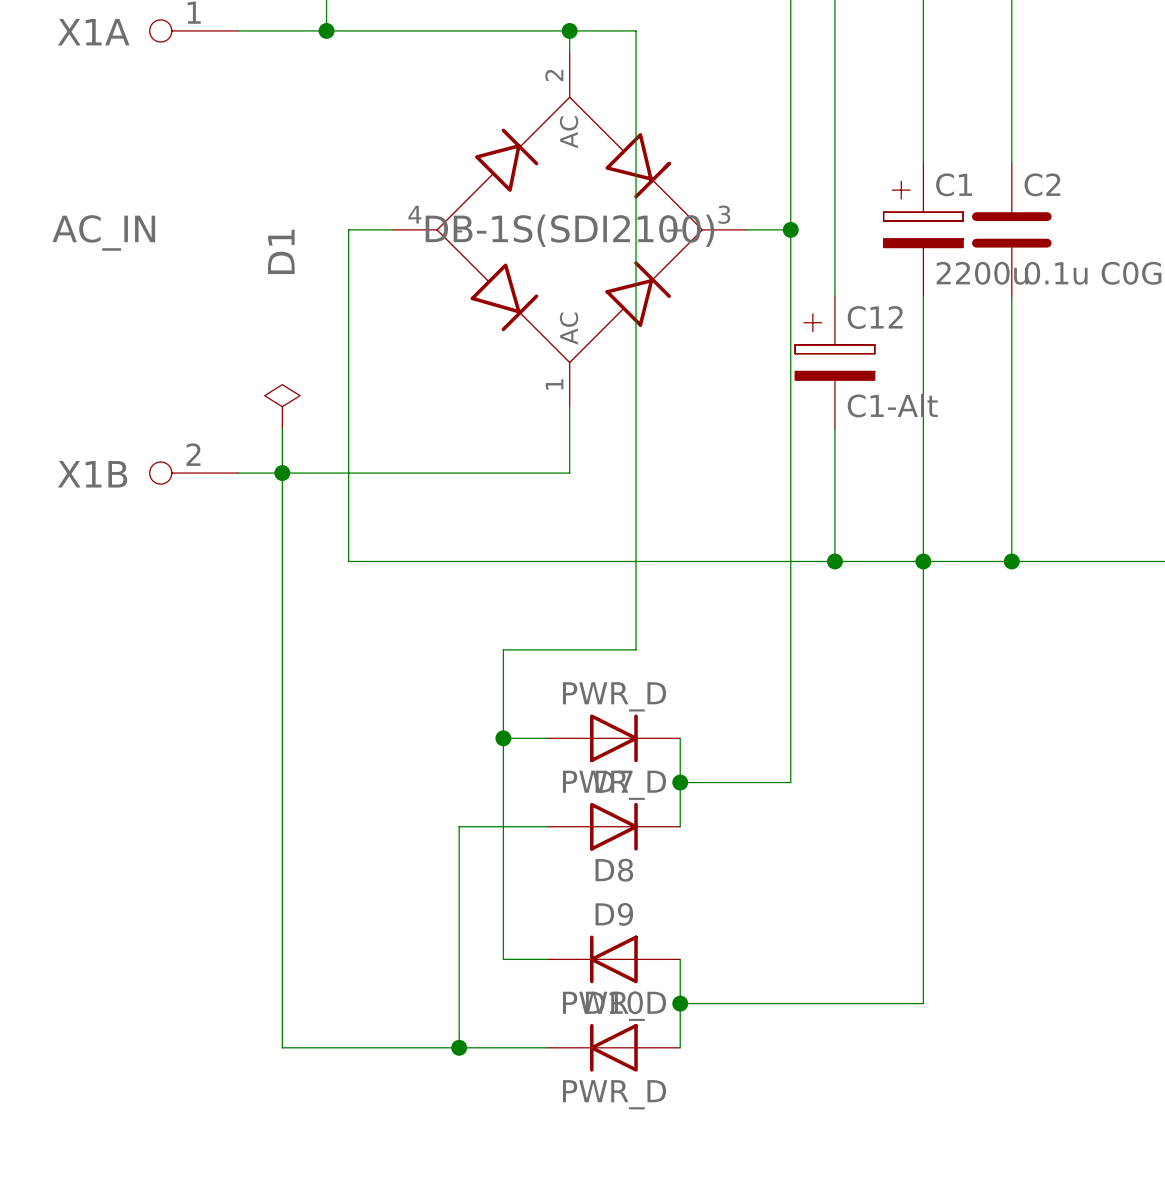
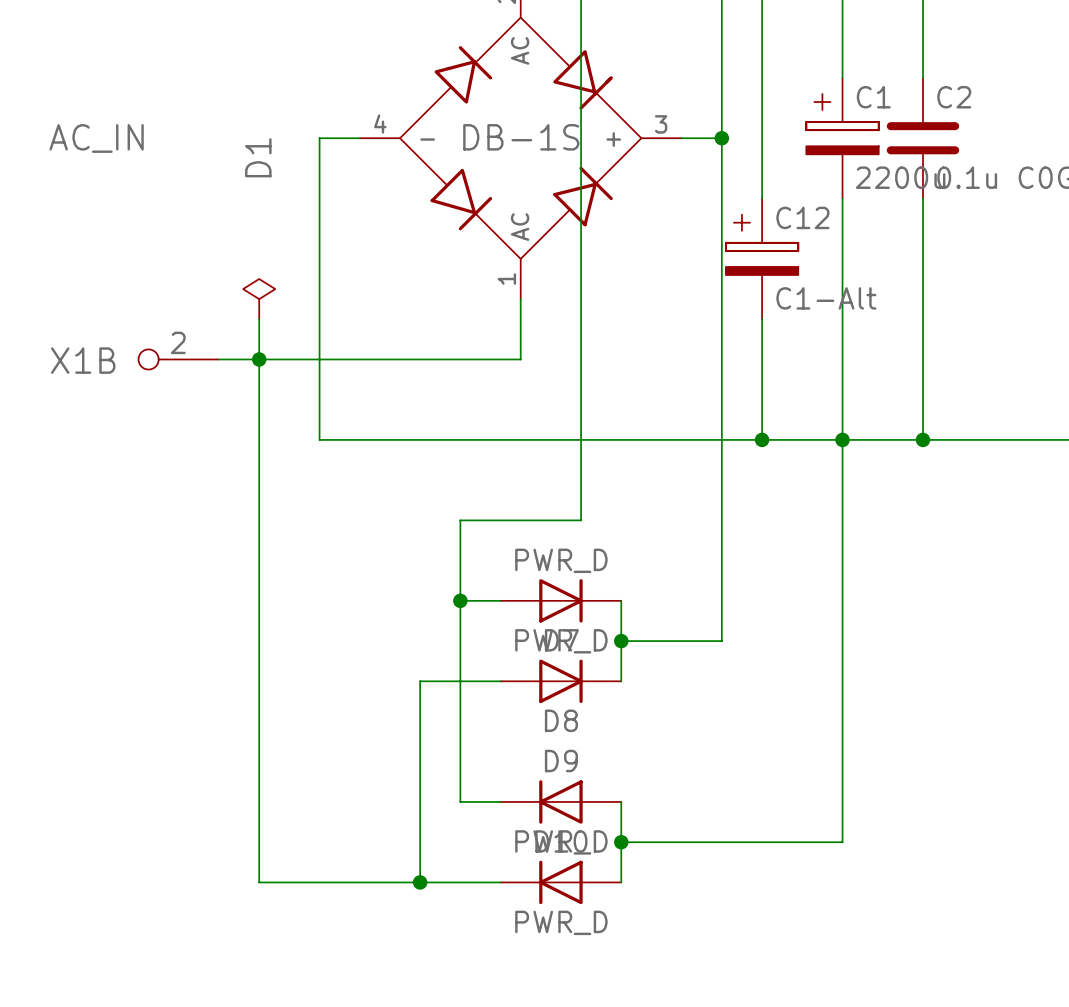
D1 value: DB-1S(SDI2100) (569, 230) -> DB-1S (521, 137)

